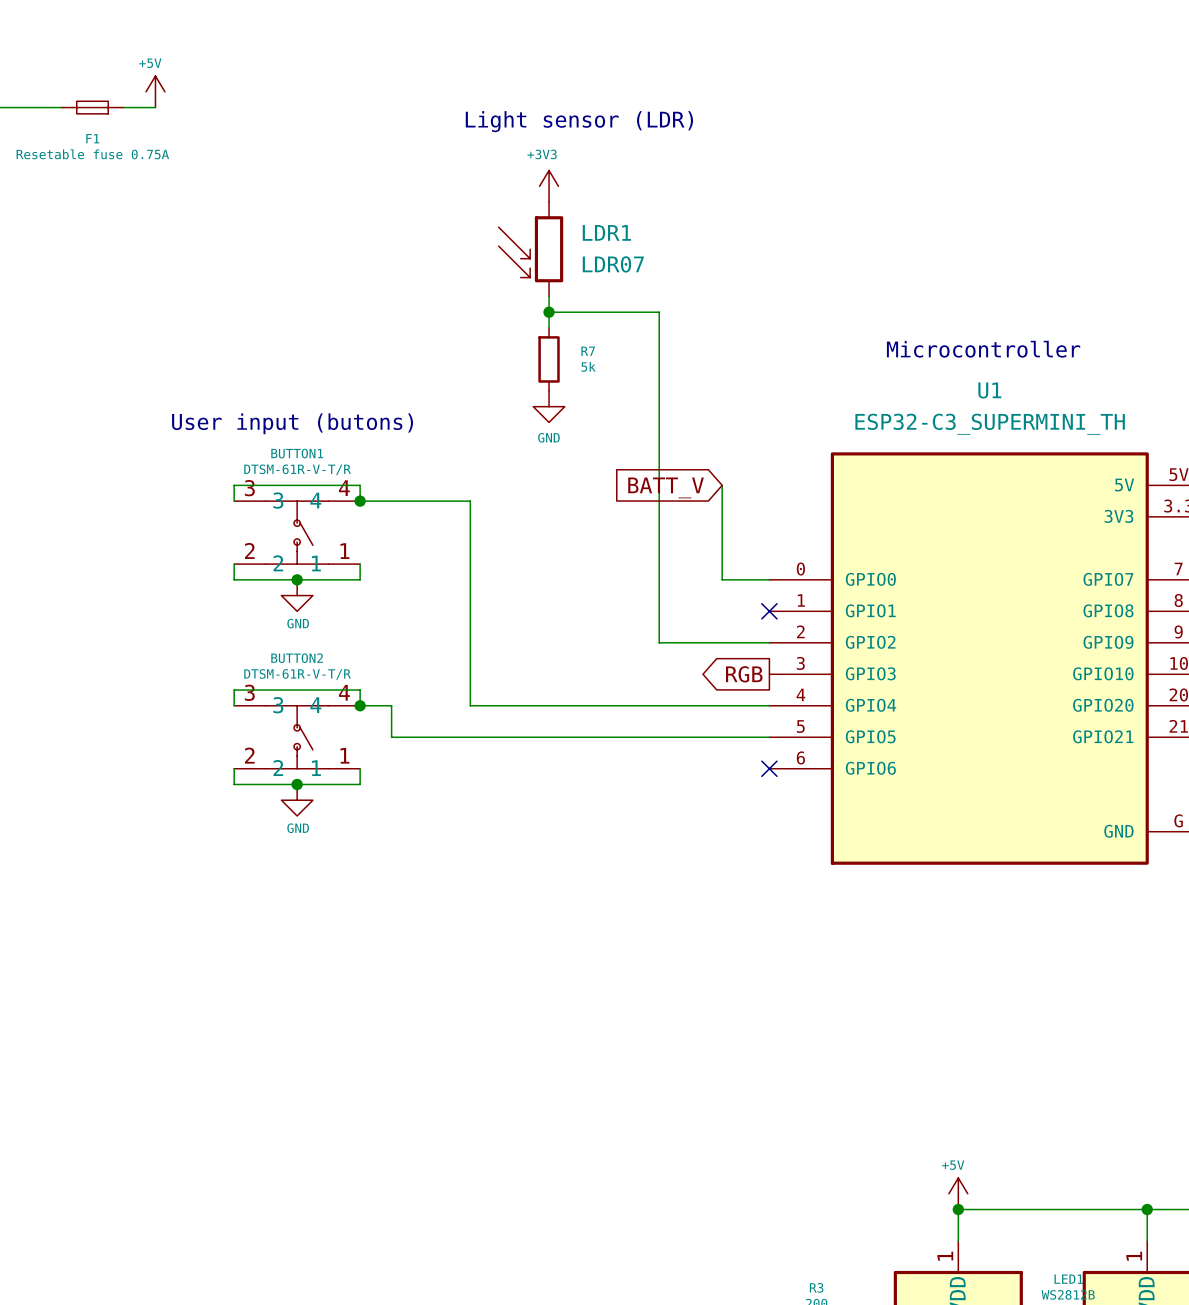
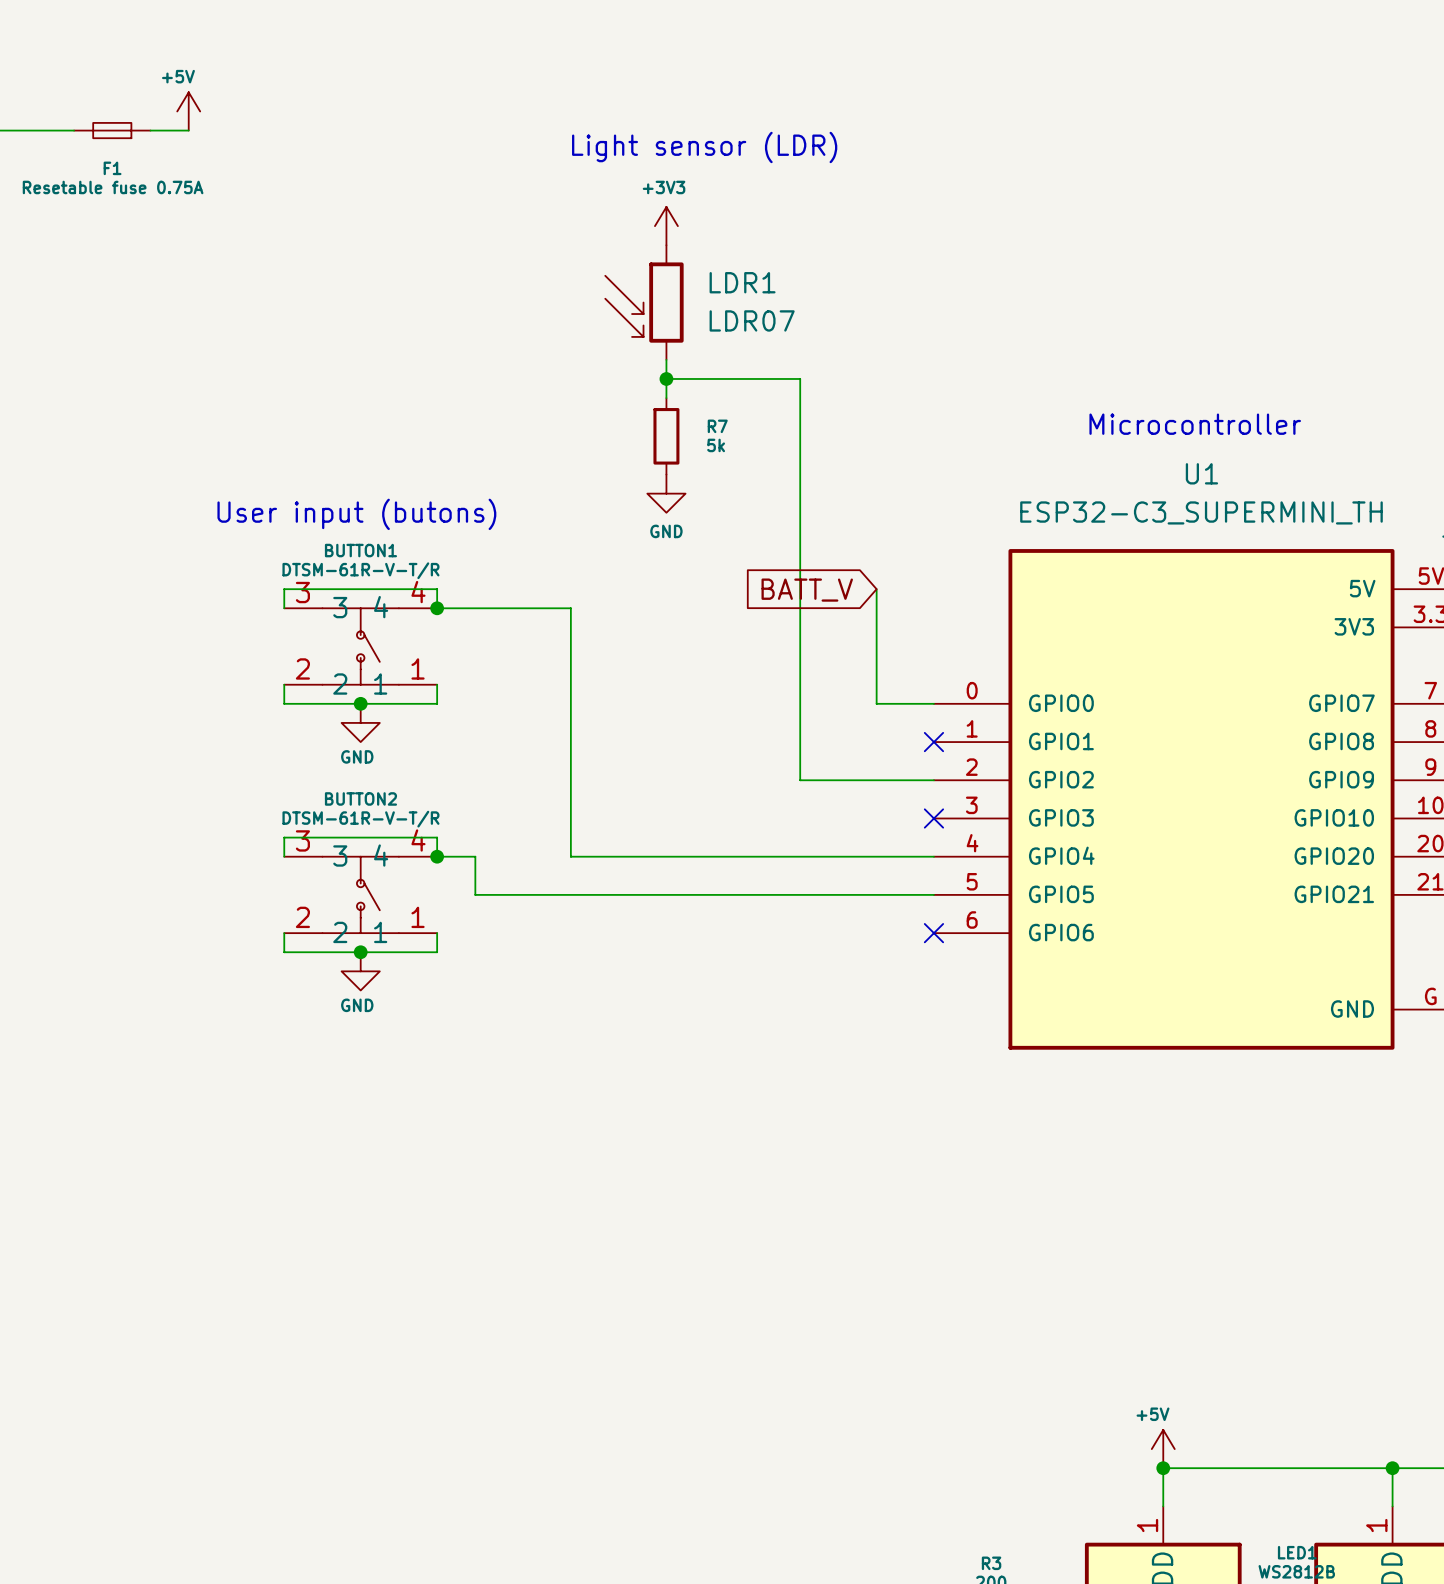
global label: RGB (744, 674) -> none
no-connect mark: none -> (933, 818)

